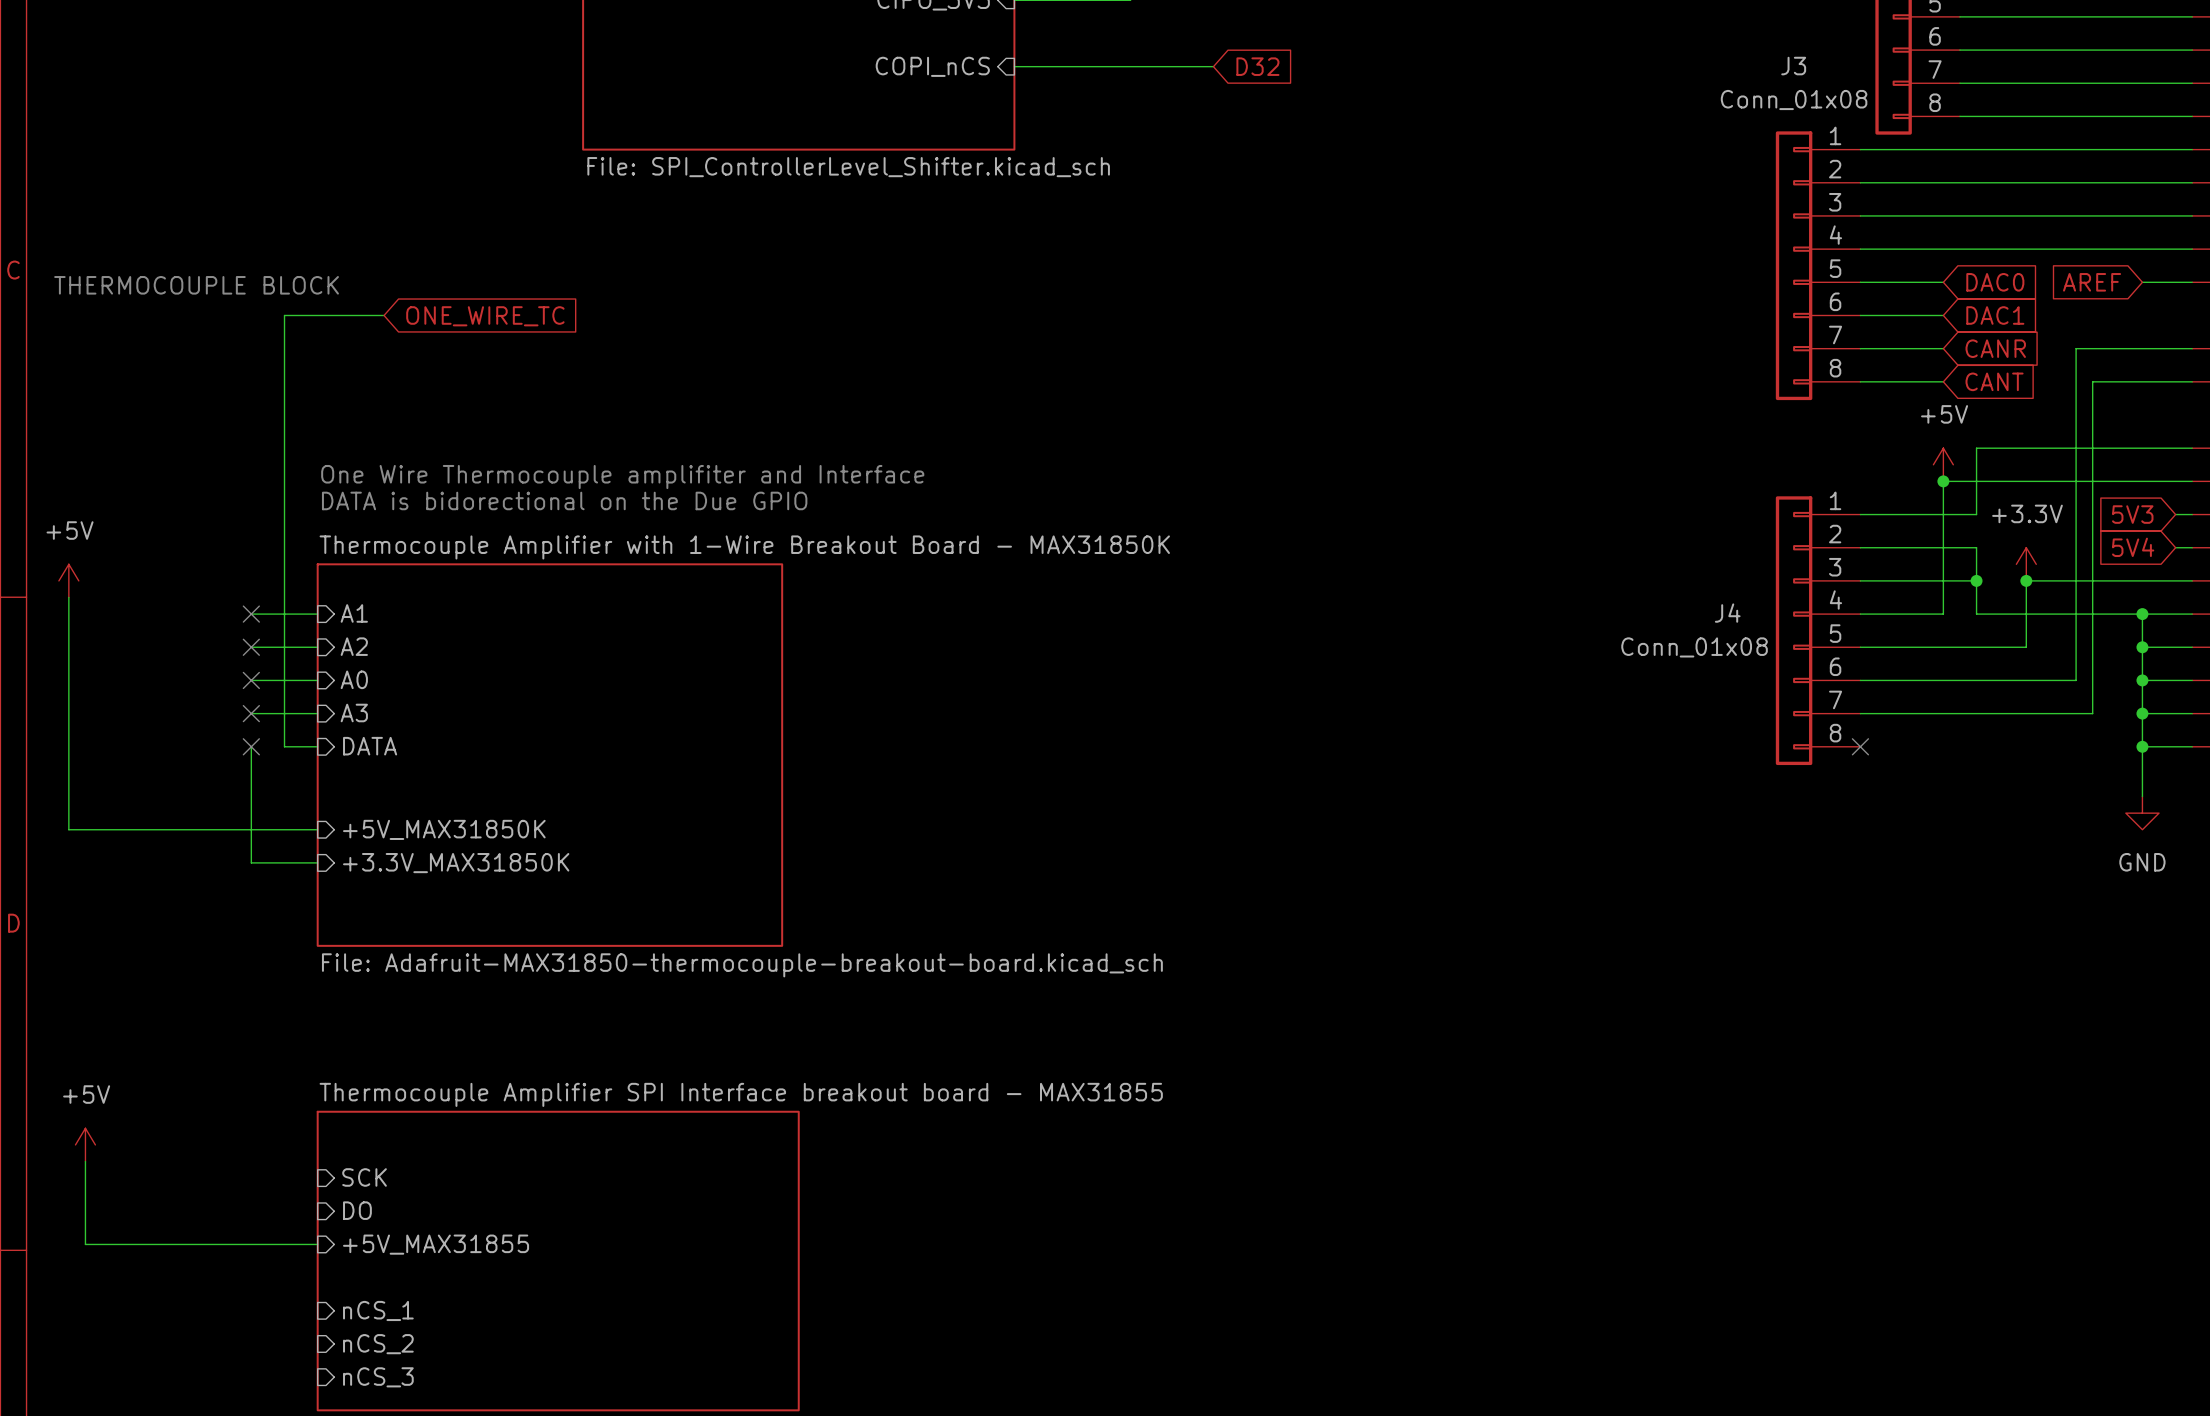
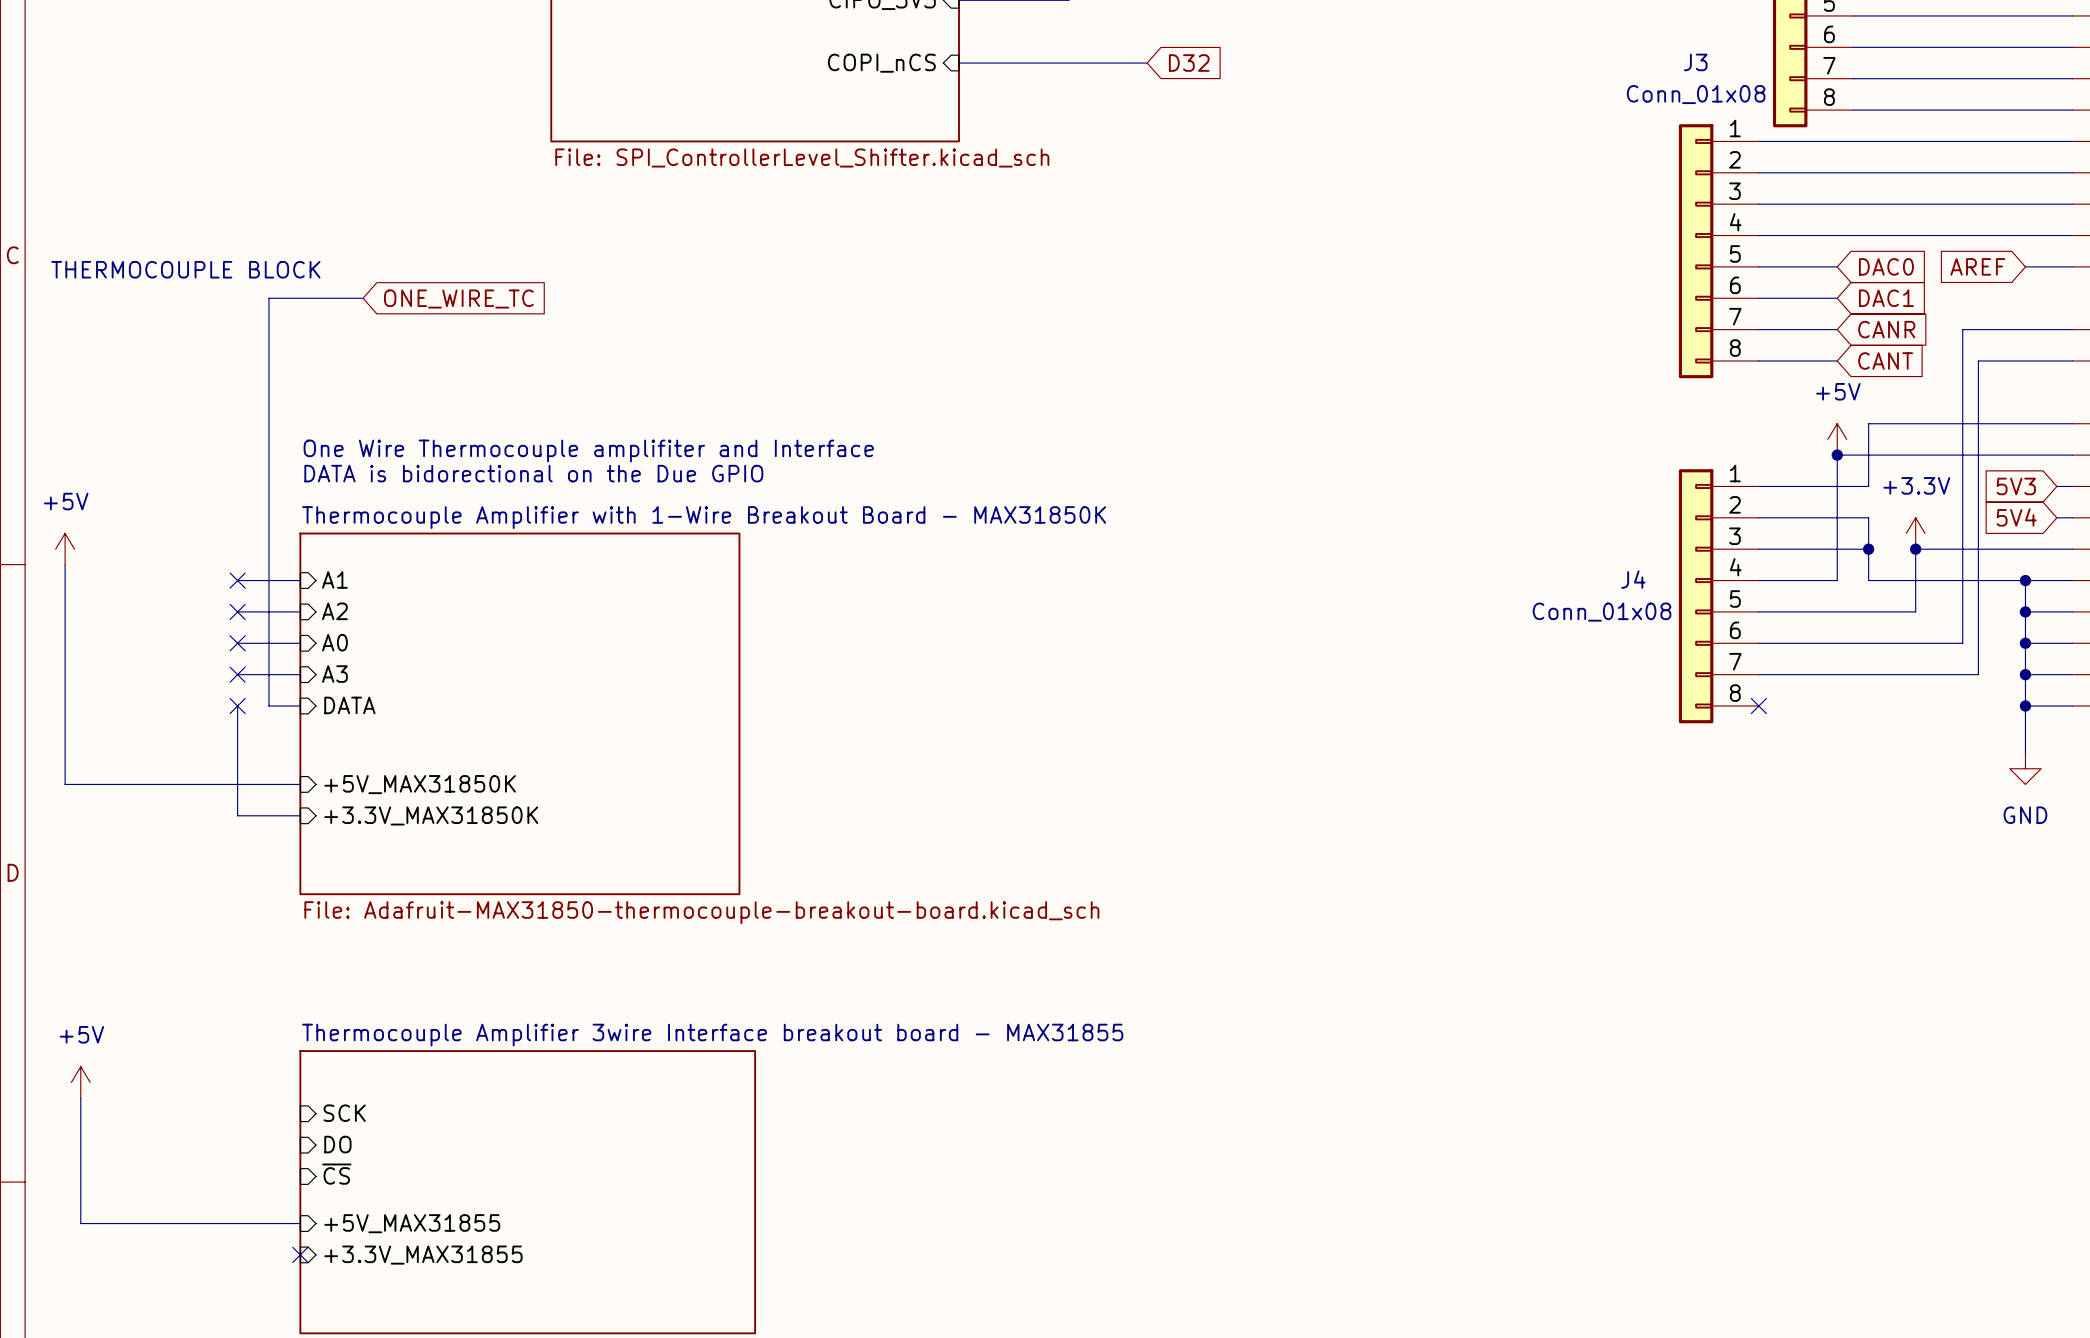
sheet Thermocouple Amplifier SPI Interface breakout board - MAX31855 name: Thermocouple Amplifier SPI Interface breakout board - MAX31855 (741, 1094) -> Thermocouple Amplifier 3wire Interface breakout board - MAX31855 (712, 1035)
wire: (85, 1244) (317, 1244) -> (80, 1176) (80, 1223) (300, 1223)
sheet pin: +5V_MAX31855 (436, 1244) -> ~{CS} (336, 1174)
sheet pin: none -> +5V_MAX31855 (412, 1223)
sheet pin: nCS_1 (378, 1310) -> none
no-connect mark: none -> (300, 1254)
sheet pin: none -> +3.3V_MAX31855 (423, 1255)
sheet pin: nCS_2 (378, 1344) -> none
sheet pin: nCS_3 (378, 1377) -> none

